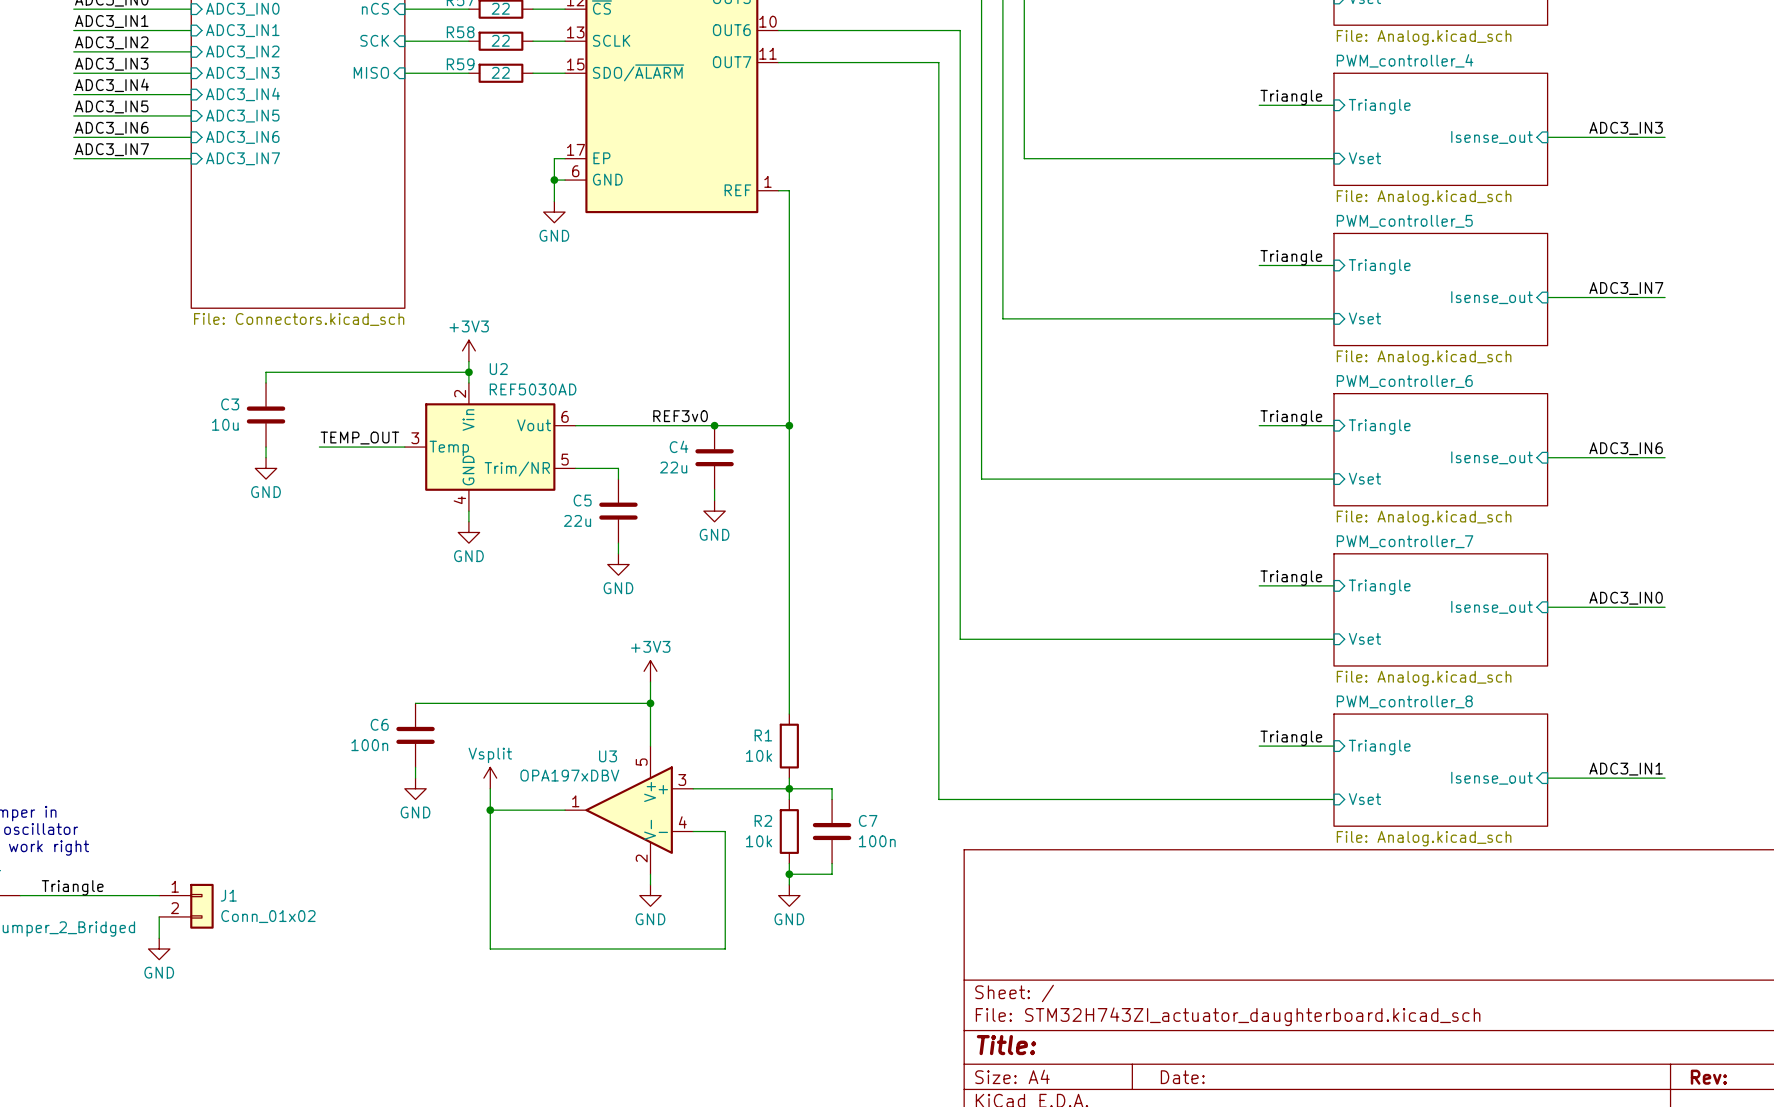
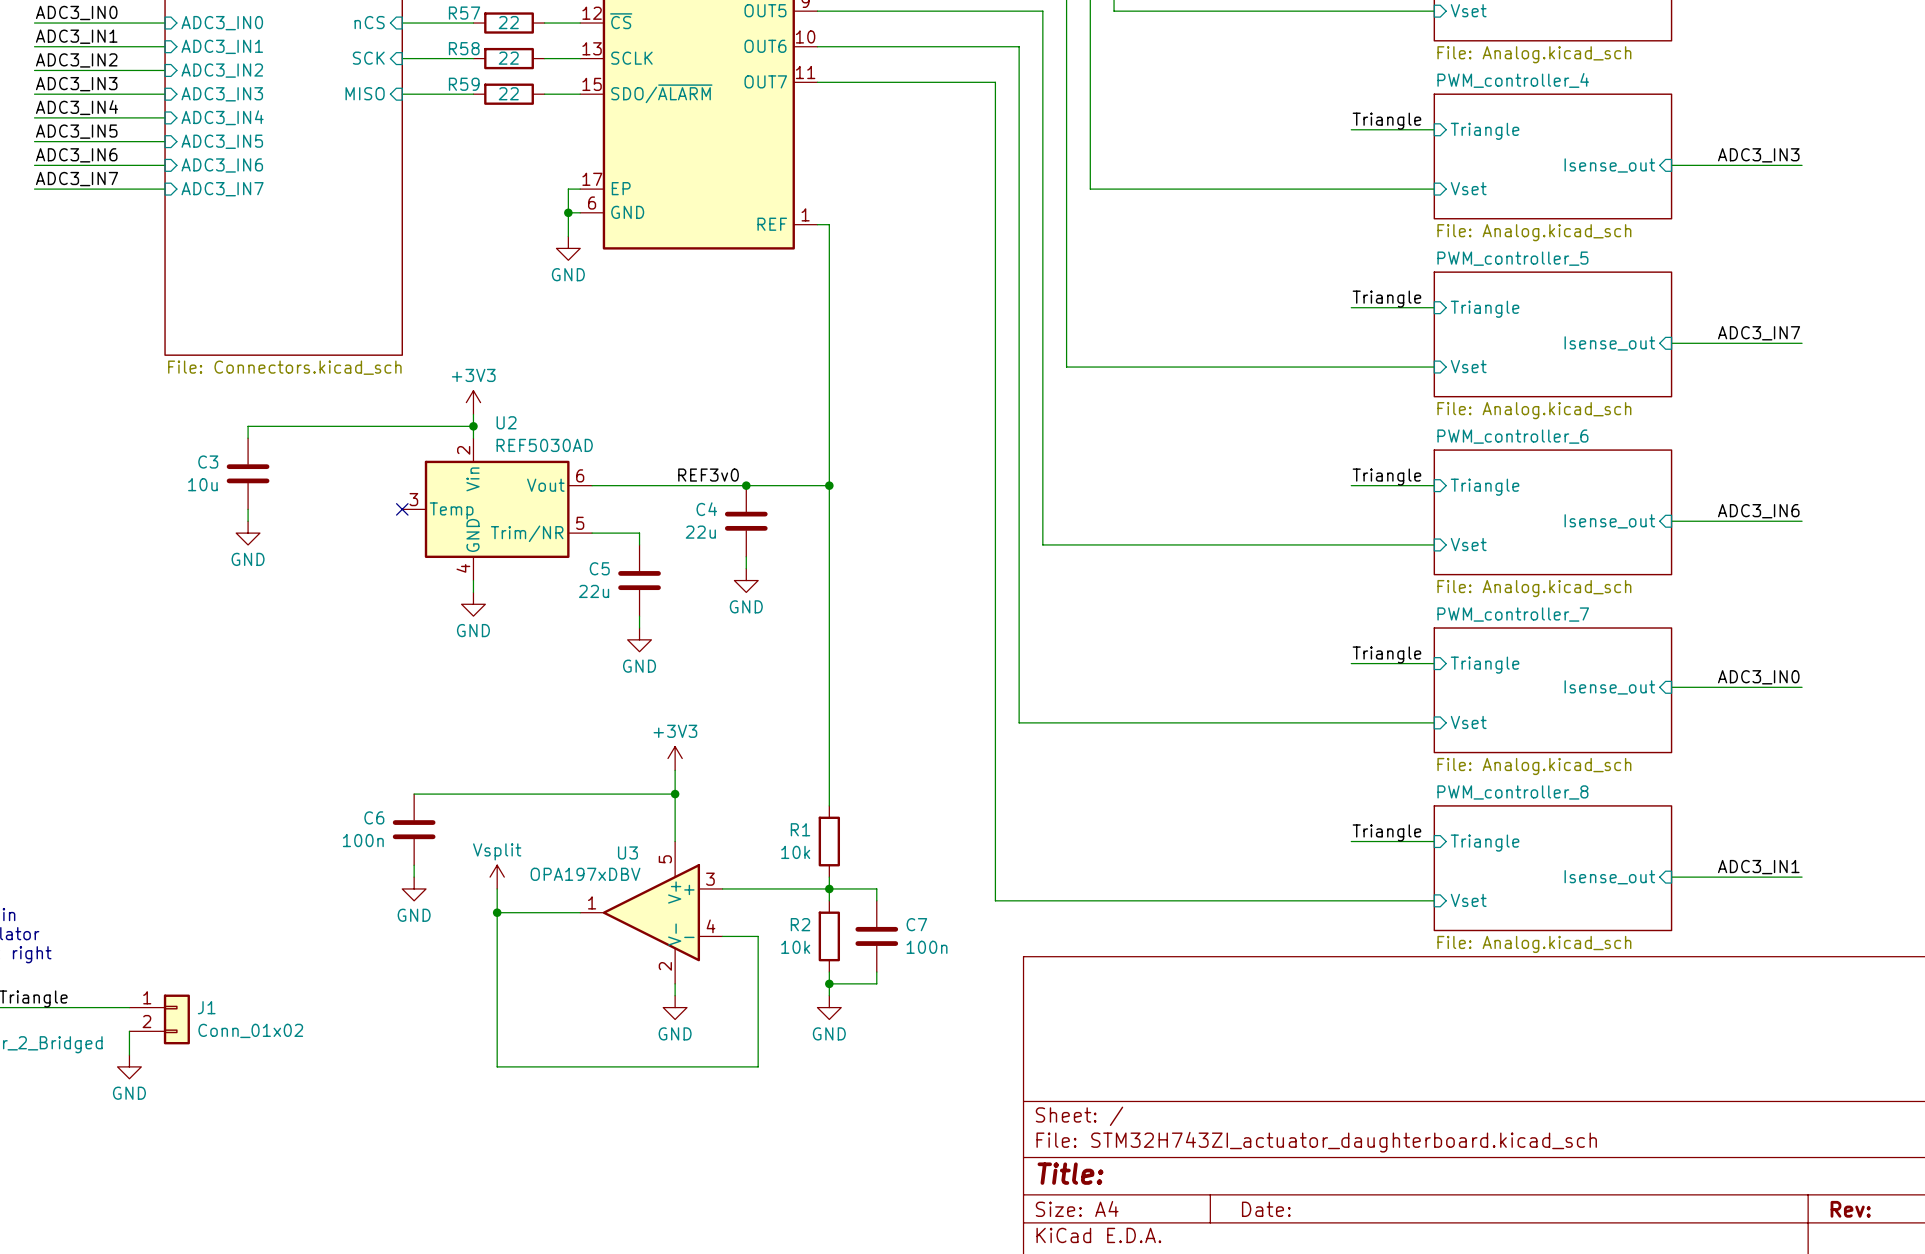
label: TEMP_OUT (359, 438) -> none
wire: (319, 447) (404, 447) -> none
no-connect mark: none -> (402, 509)

